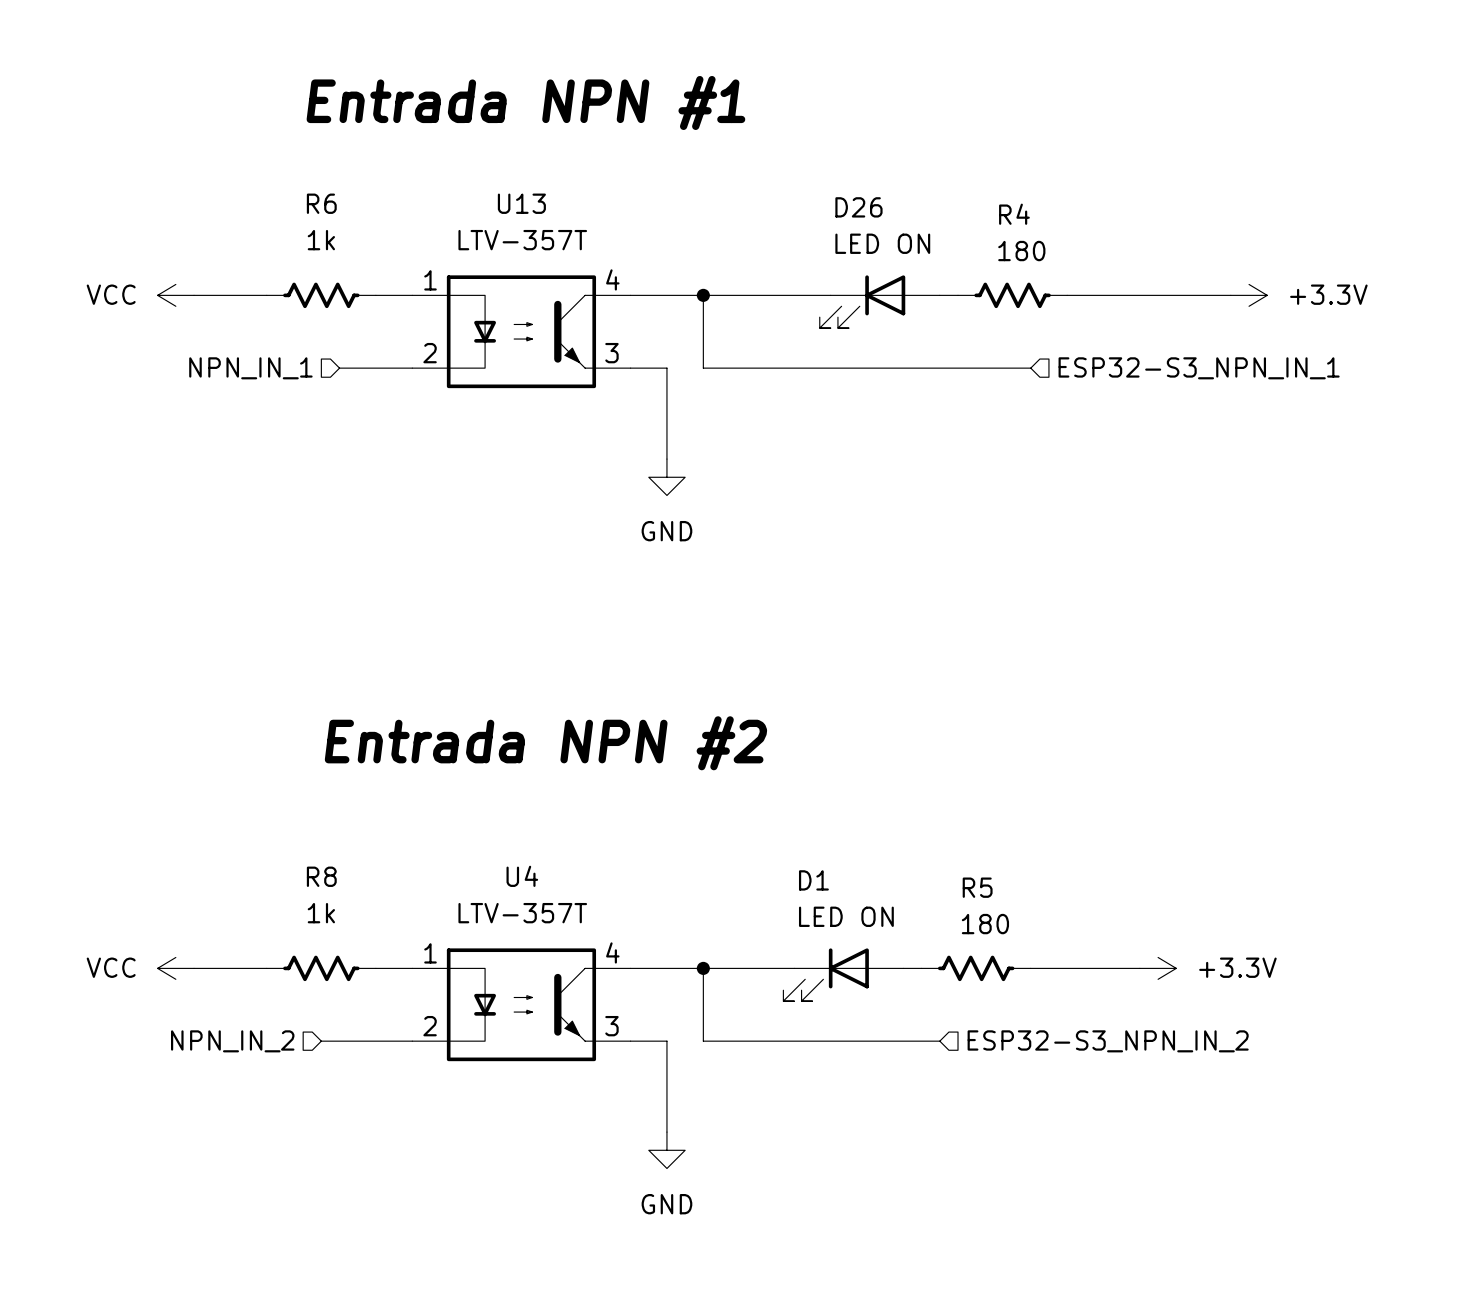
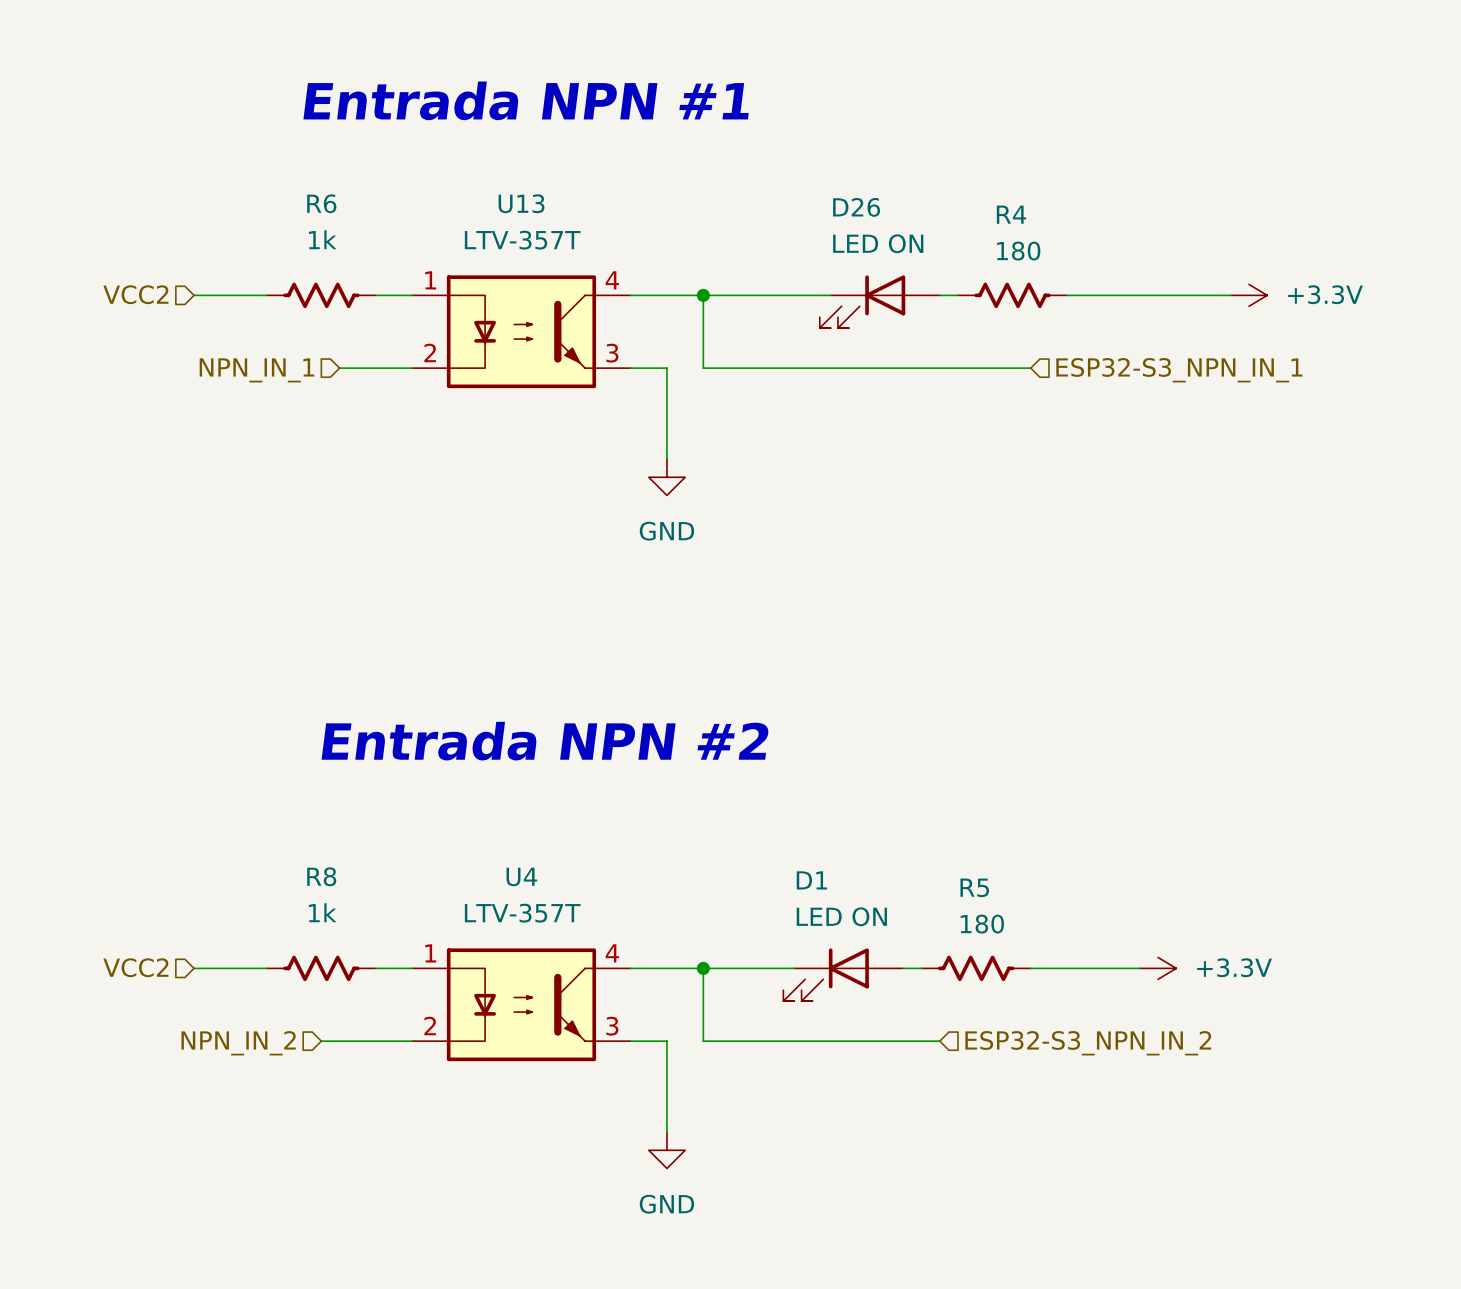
hierarchical label: none -> VCC2 (135, 294)
power symbol: VCC (175, 295) -> none
hierarchical label: none -> VCC2 (135, 967)
power symbol: VCC (175, 968) -> none

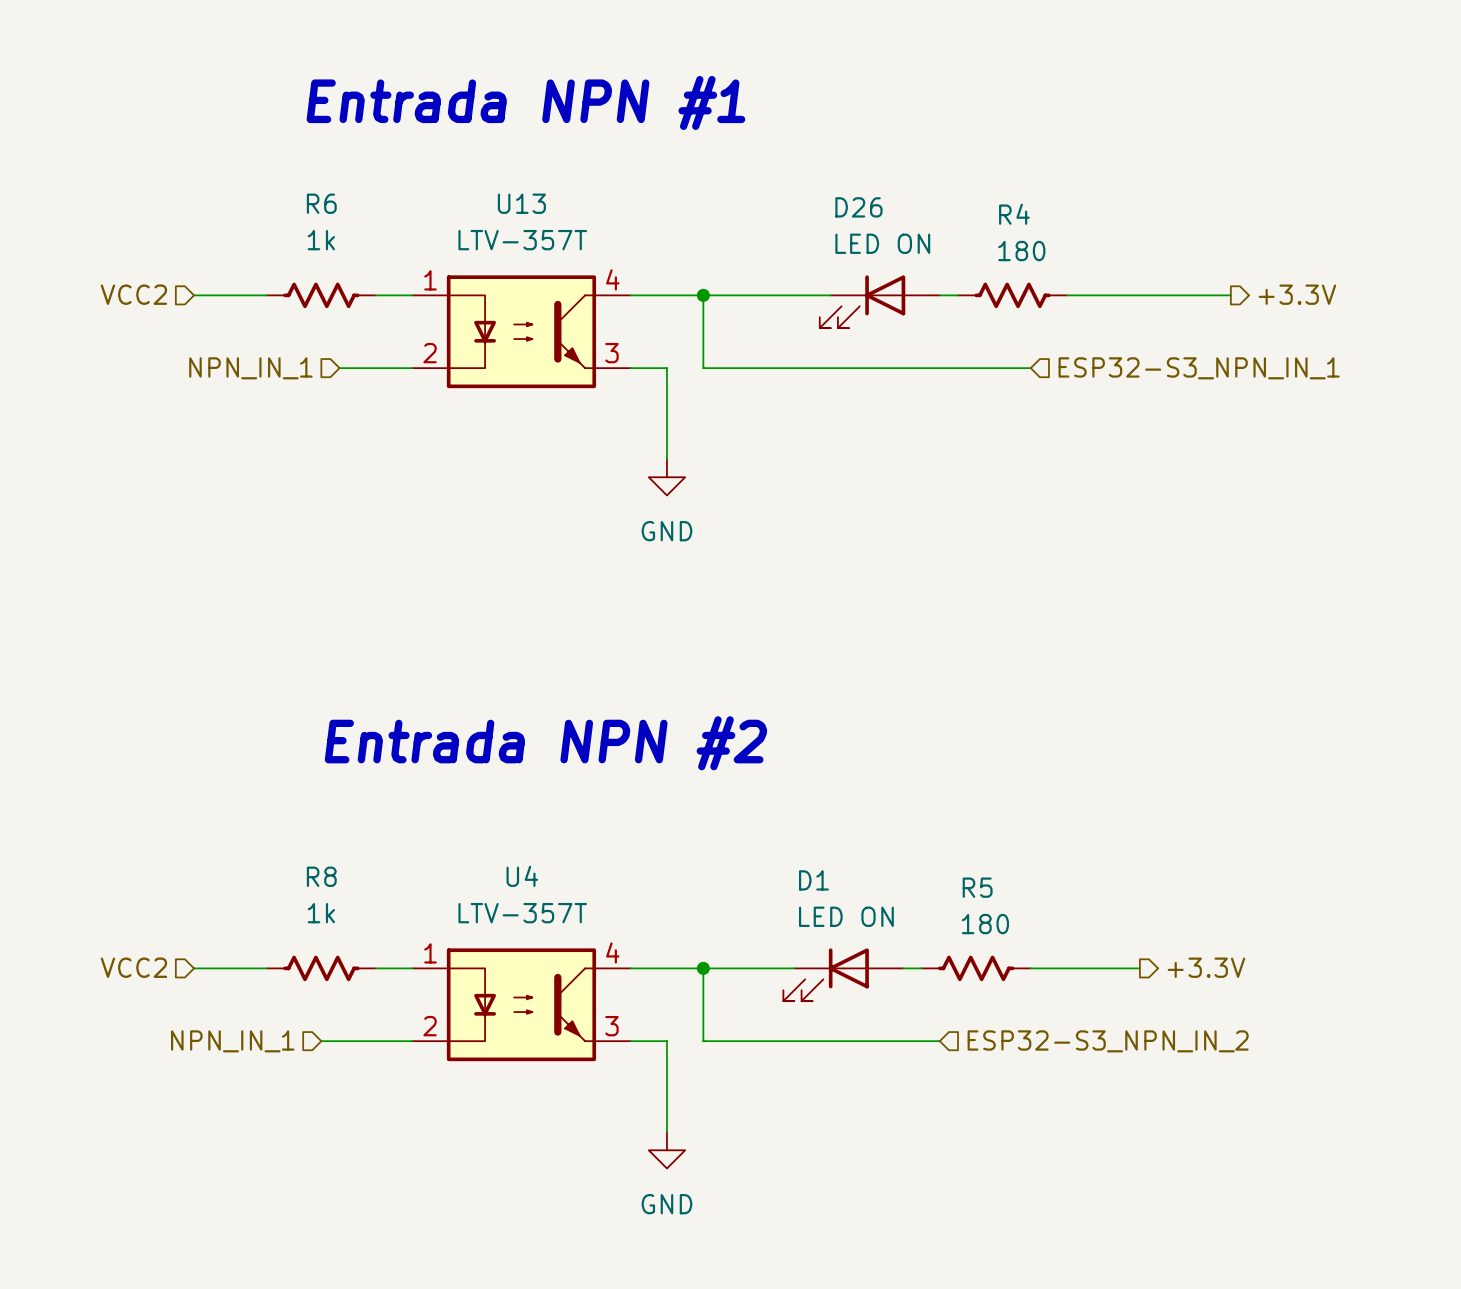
hierarchical label: none -> +3.3V (1297, 294)
power symbol: +3.3V (1249, 295) -> none
hierarchical label: none -> +3.3V (1206, 967)
power symbol: +3.3V (1158, 968) -> none
hierarchical label: NPN_IN_2 (238, 1043) -> NPN_IN_1 (232, 1041)

